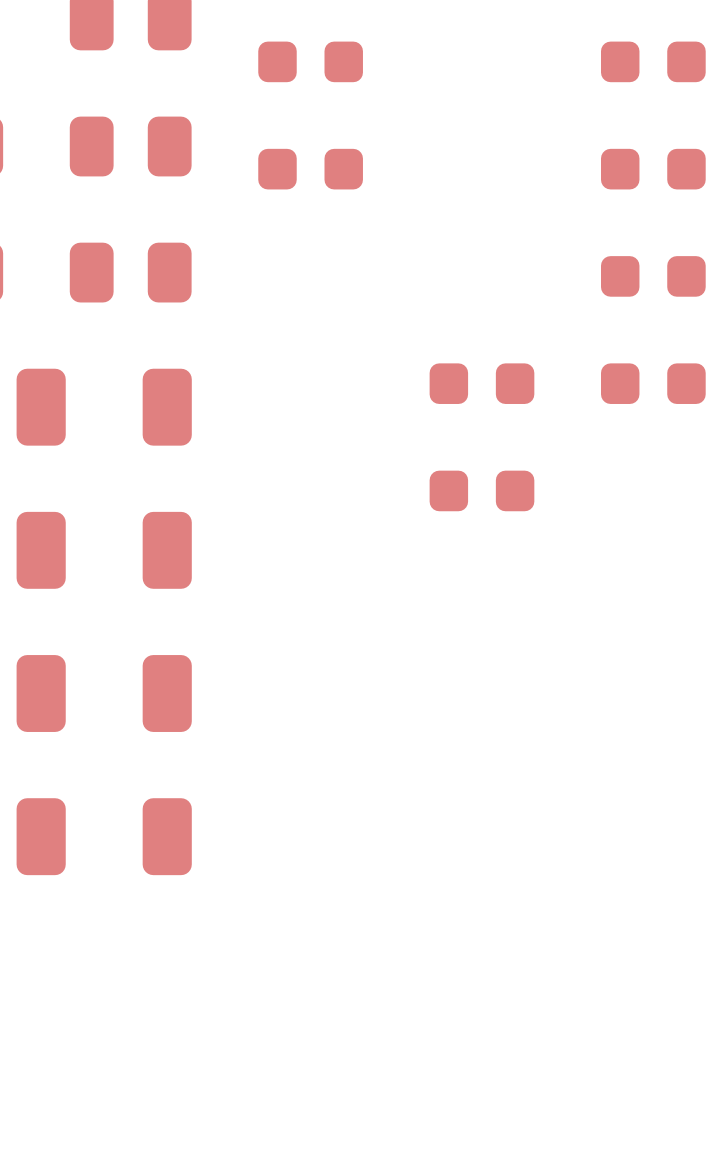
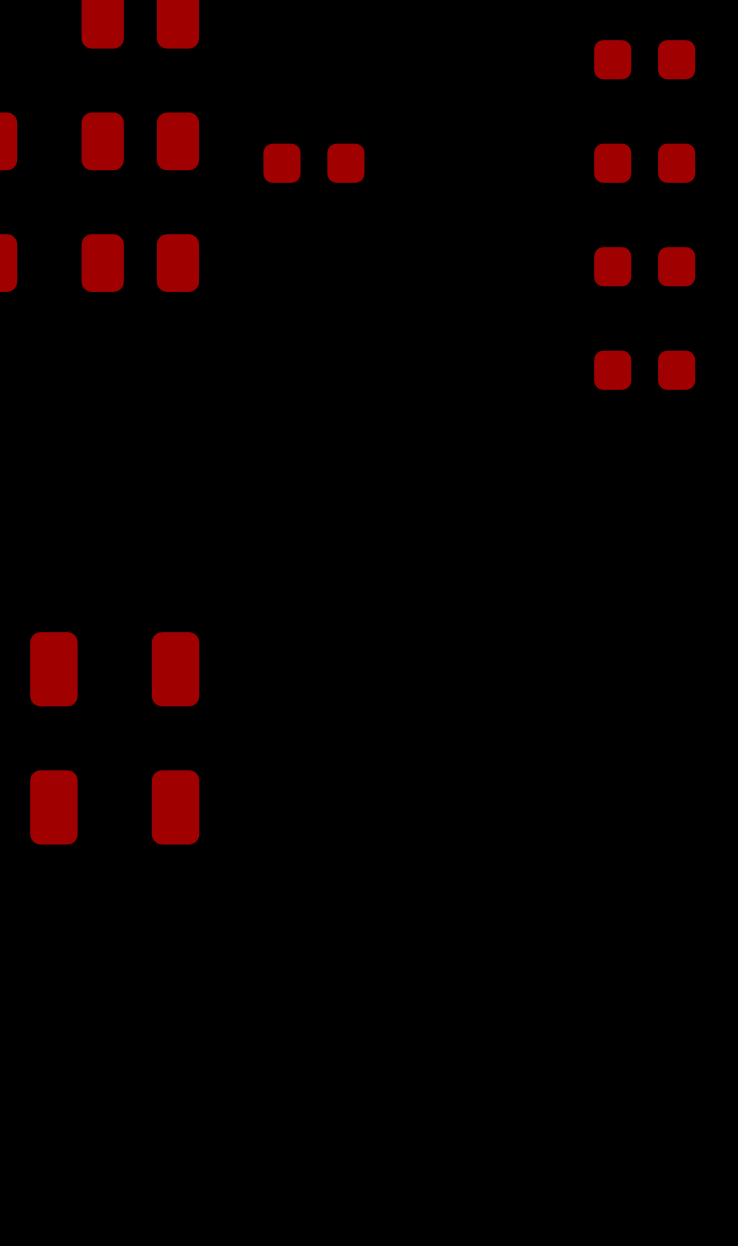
part: (310, 61) -> none
part: (481, 383) -> none
part: (104, 407) -> none
part: (481, 490) -> none
part: (104, 550) -> none

